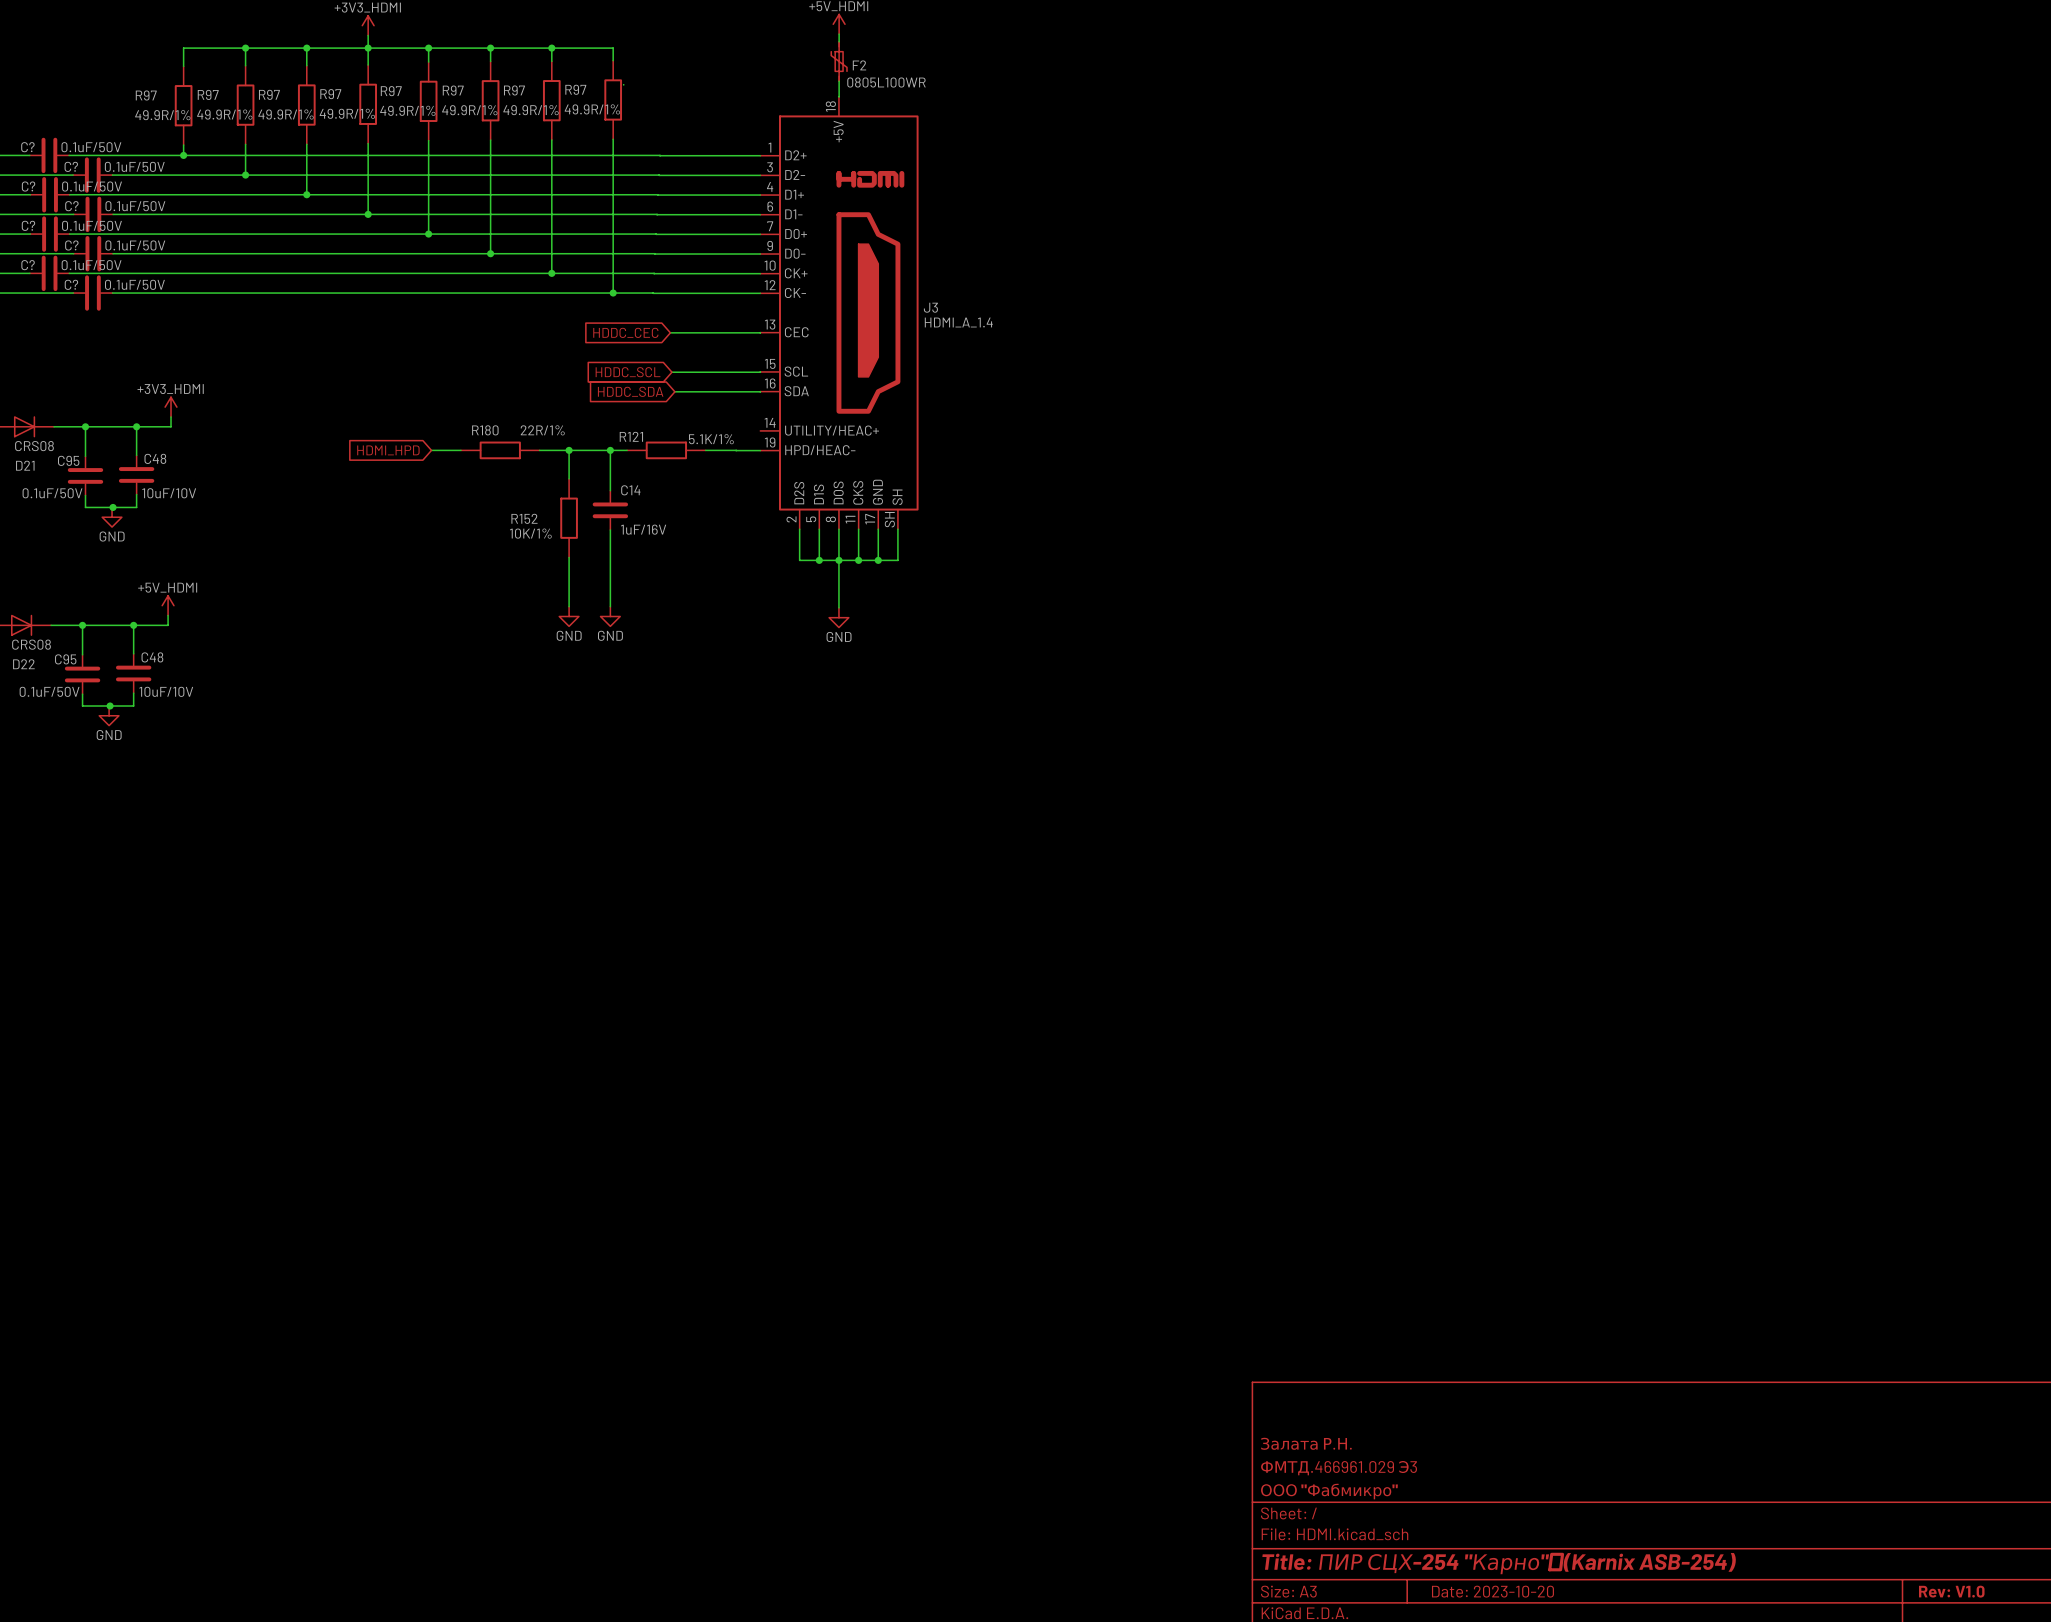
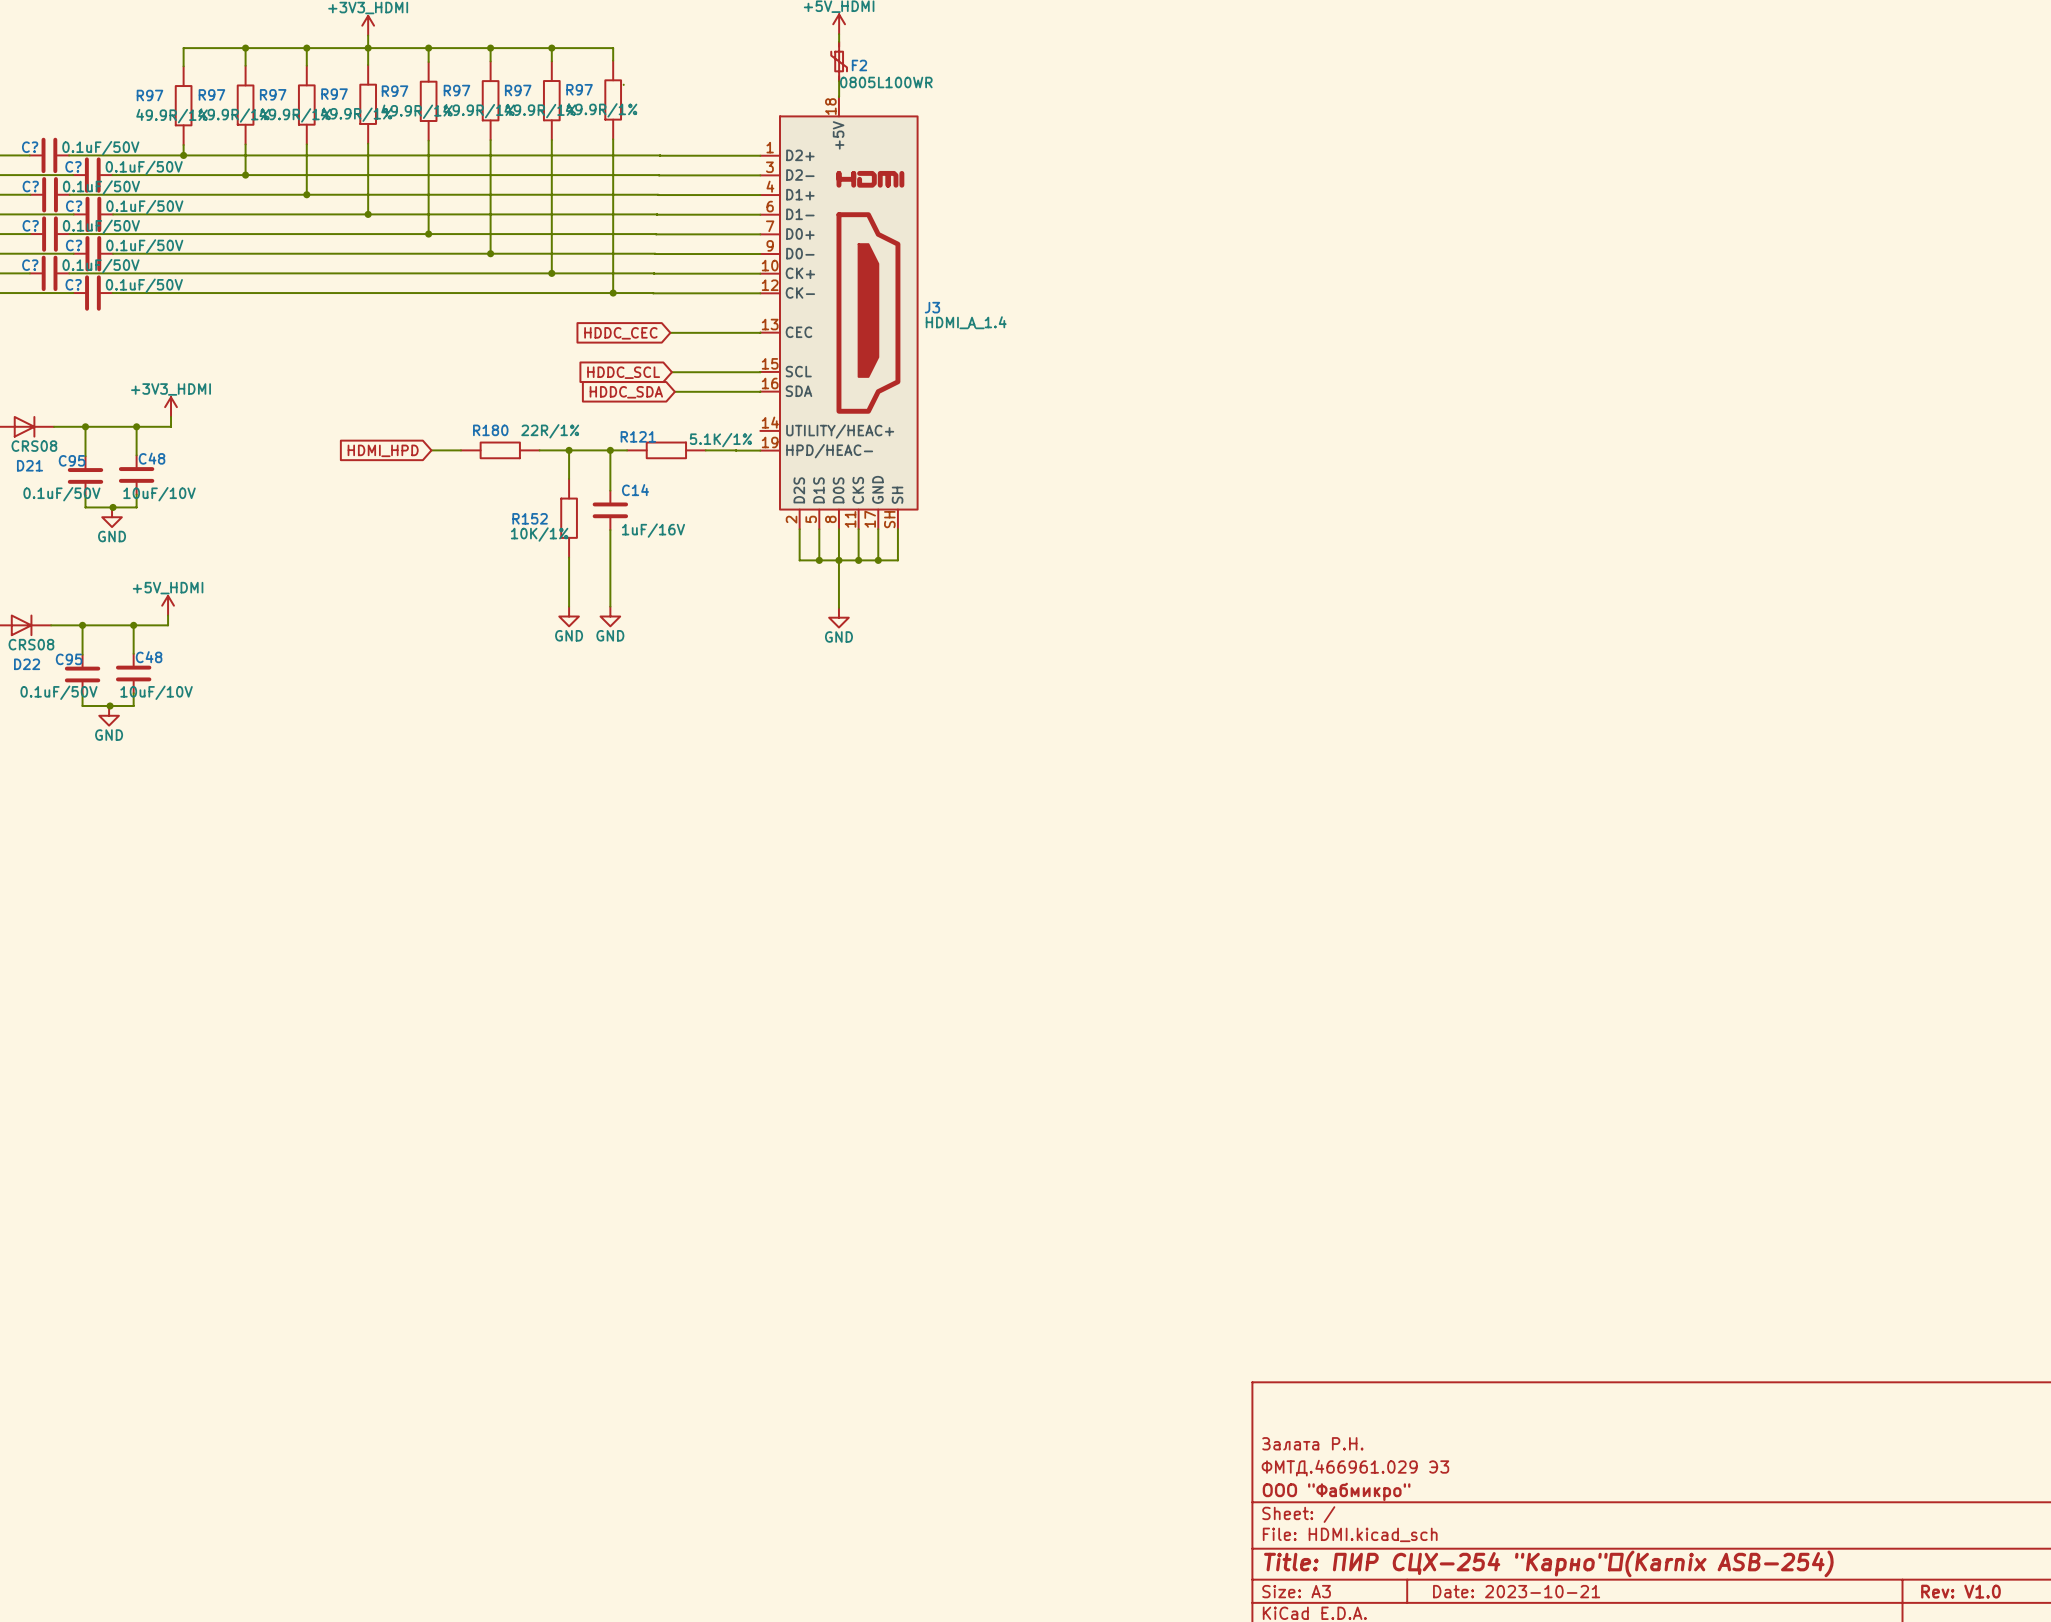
title block: Date: 2023-10-20 (1492, 1591) -> Date: 2023-10-21 (1516, 1591)

